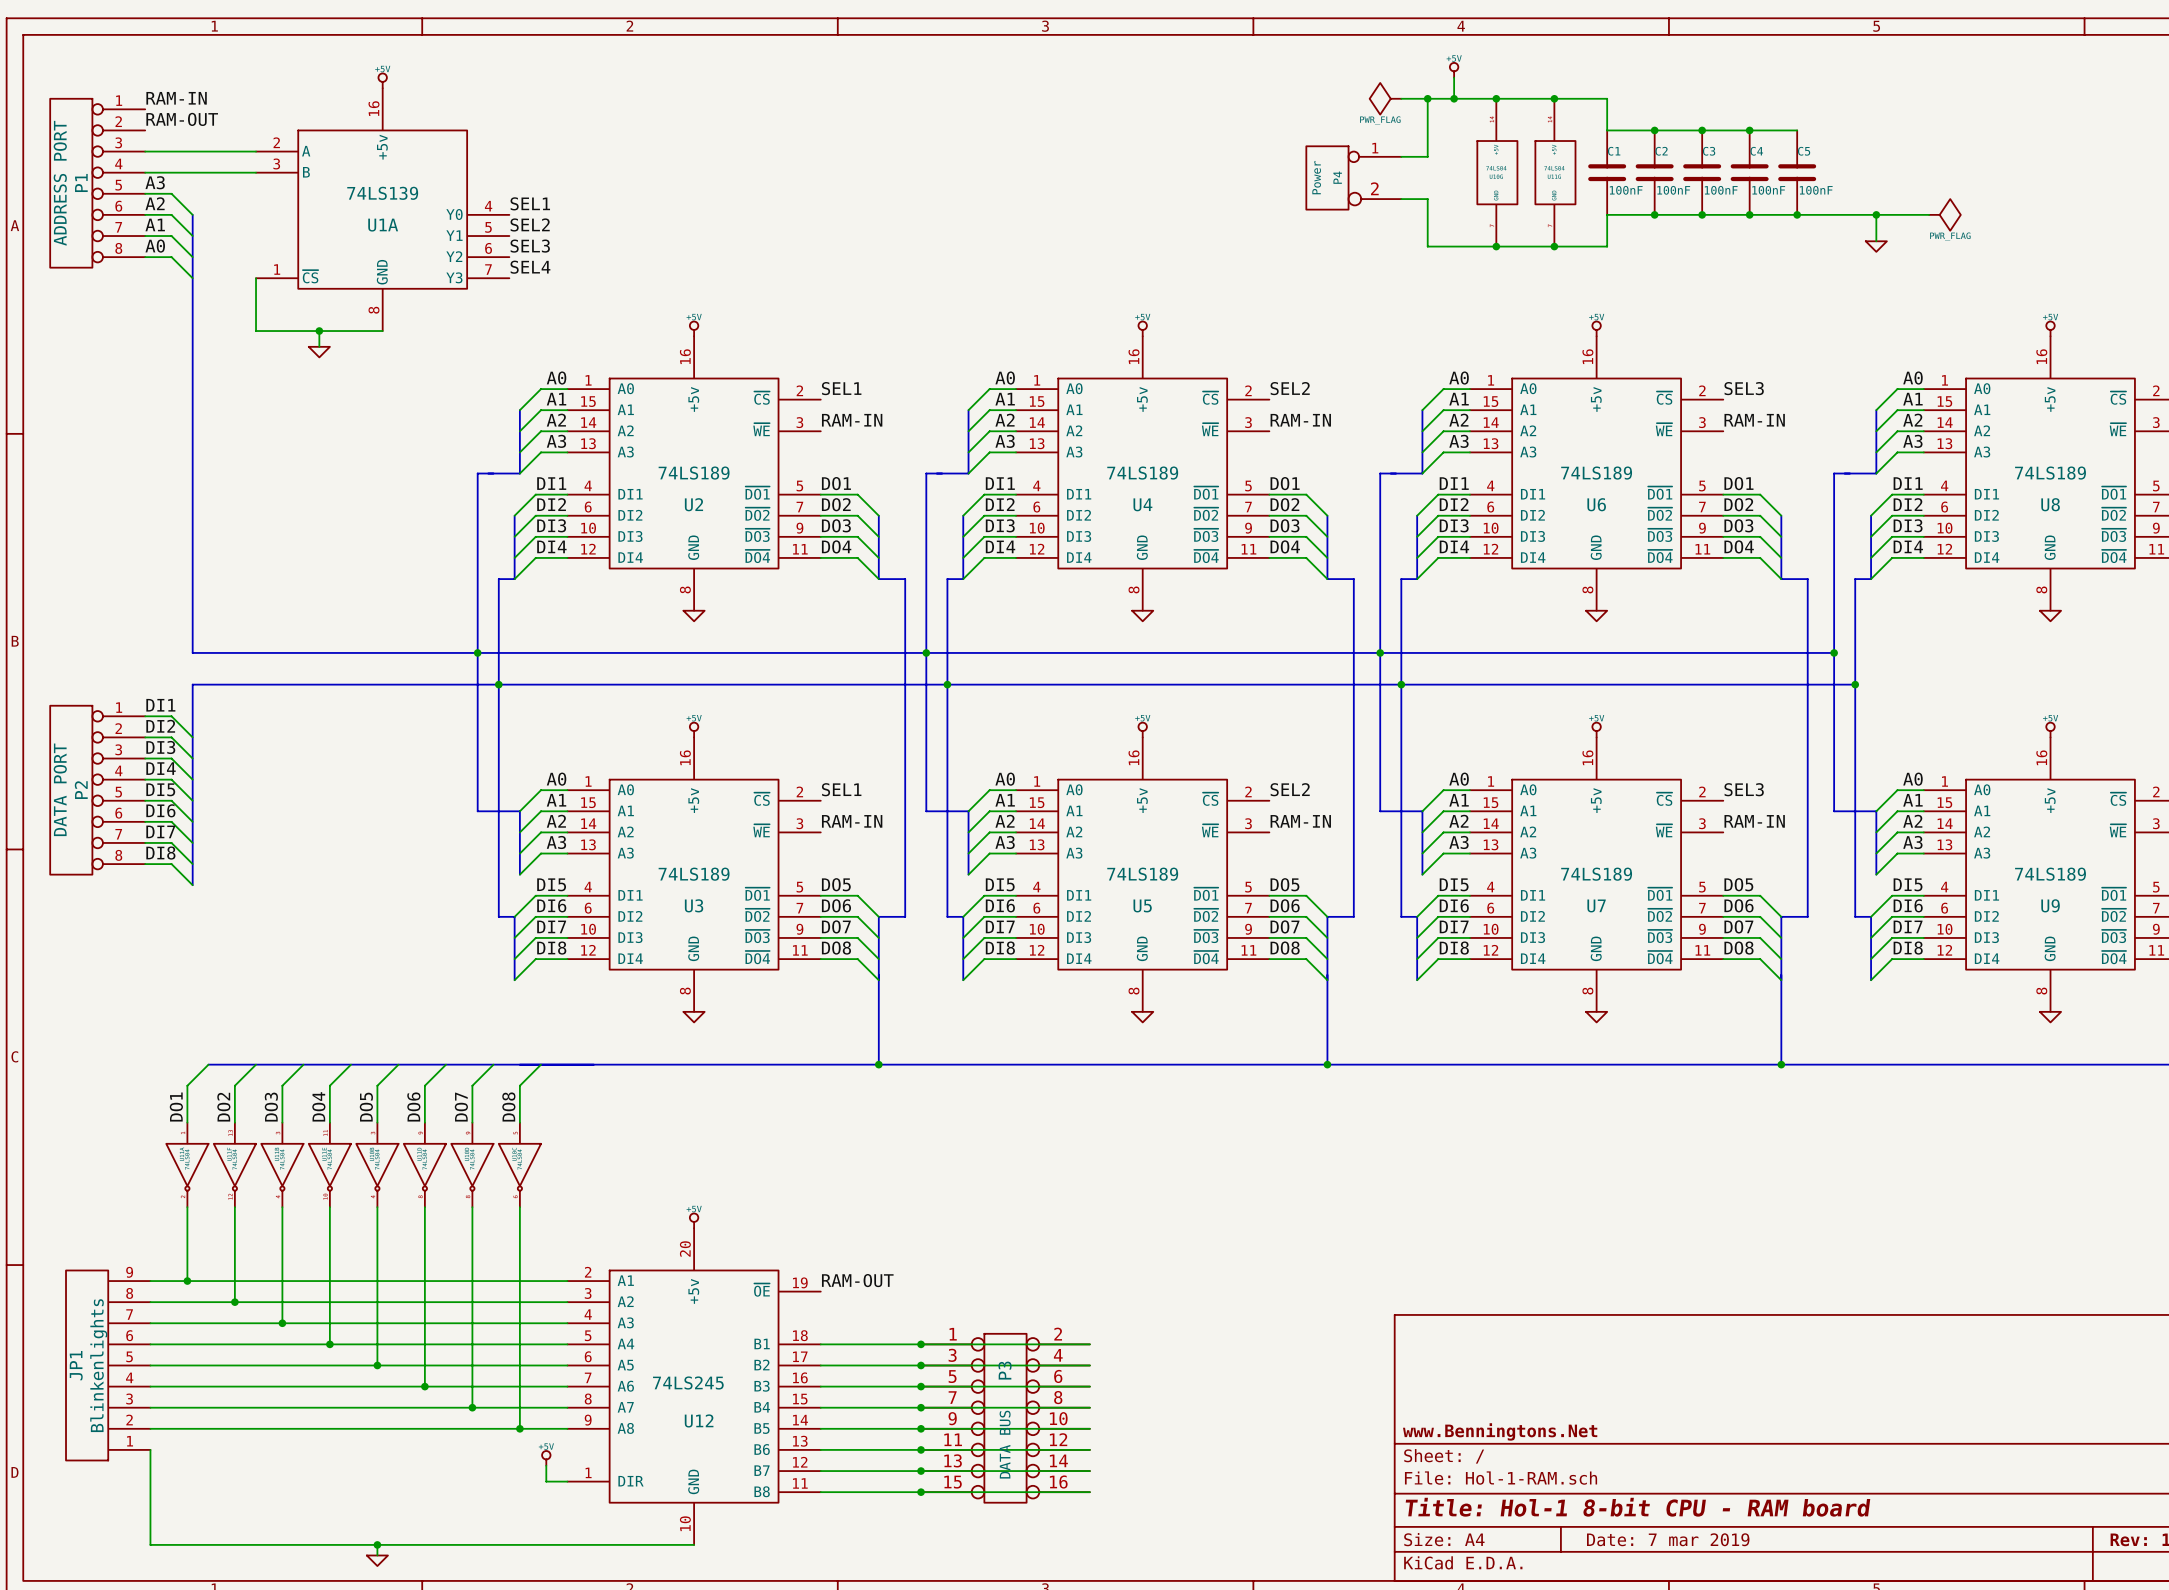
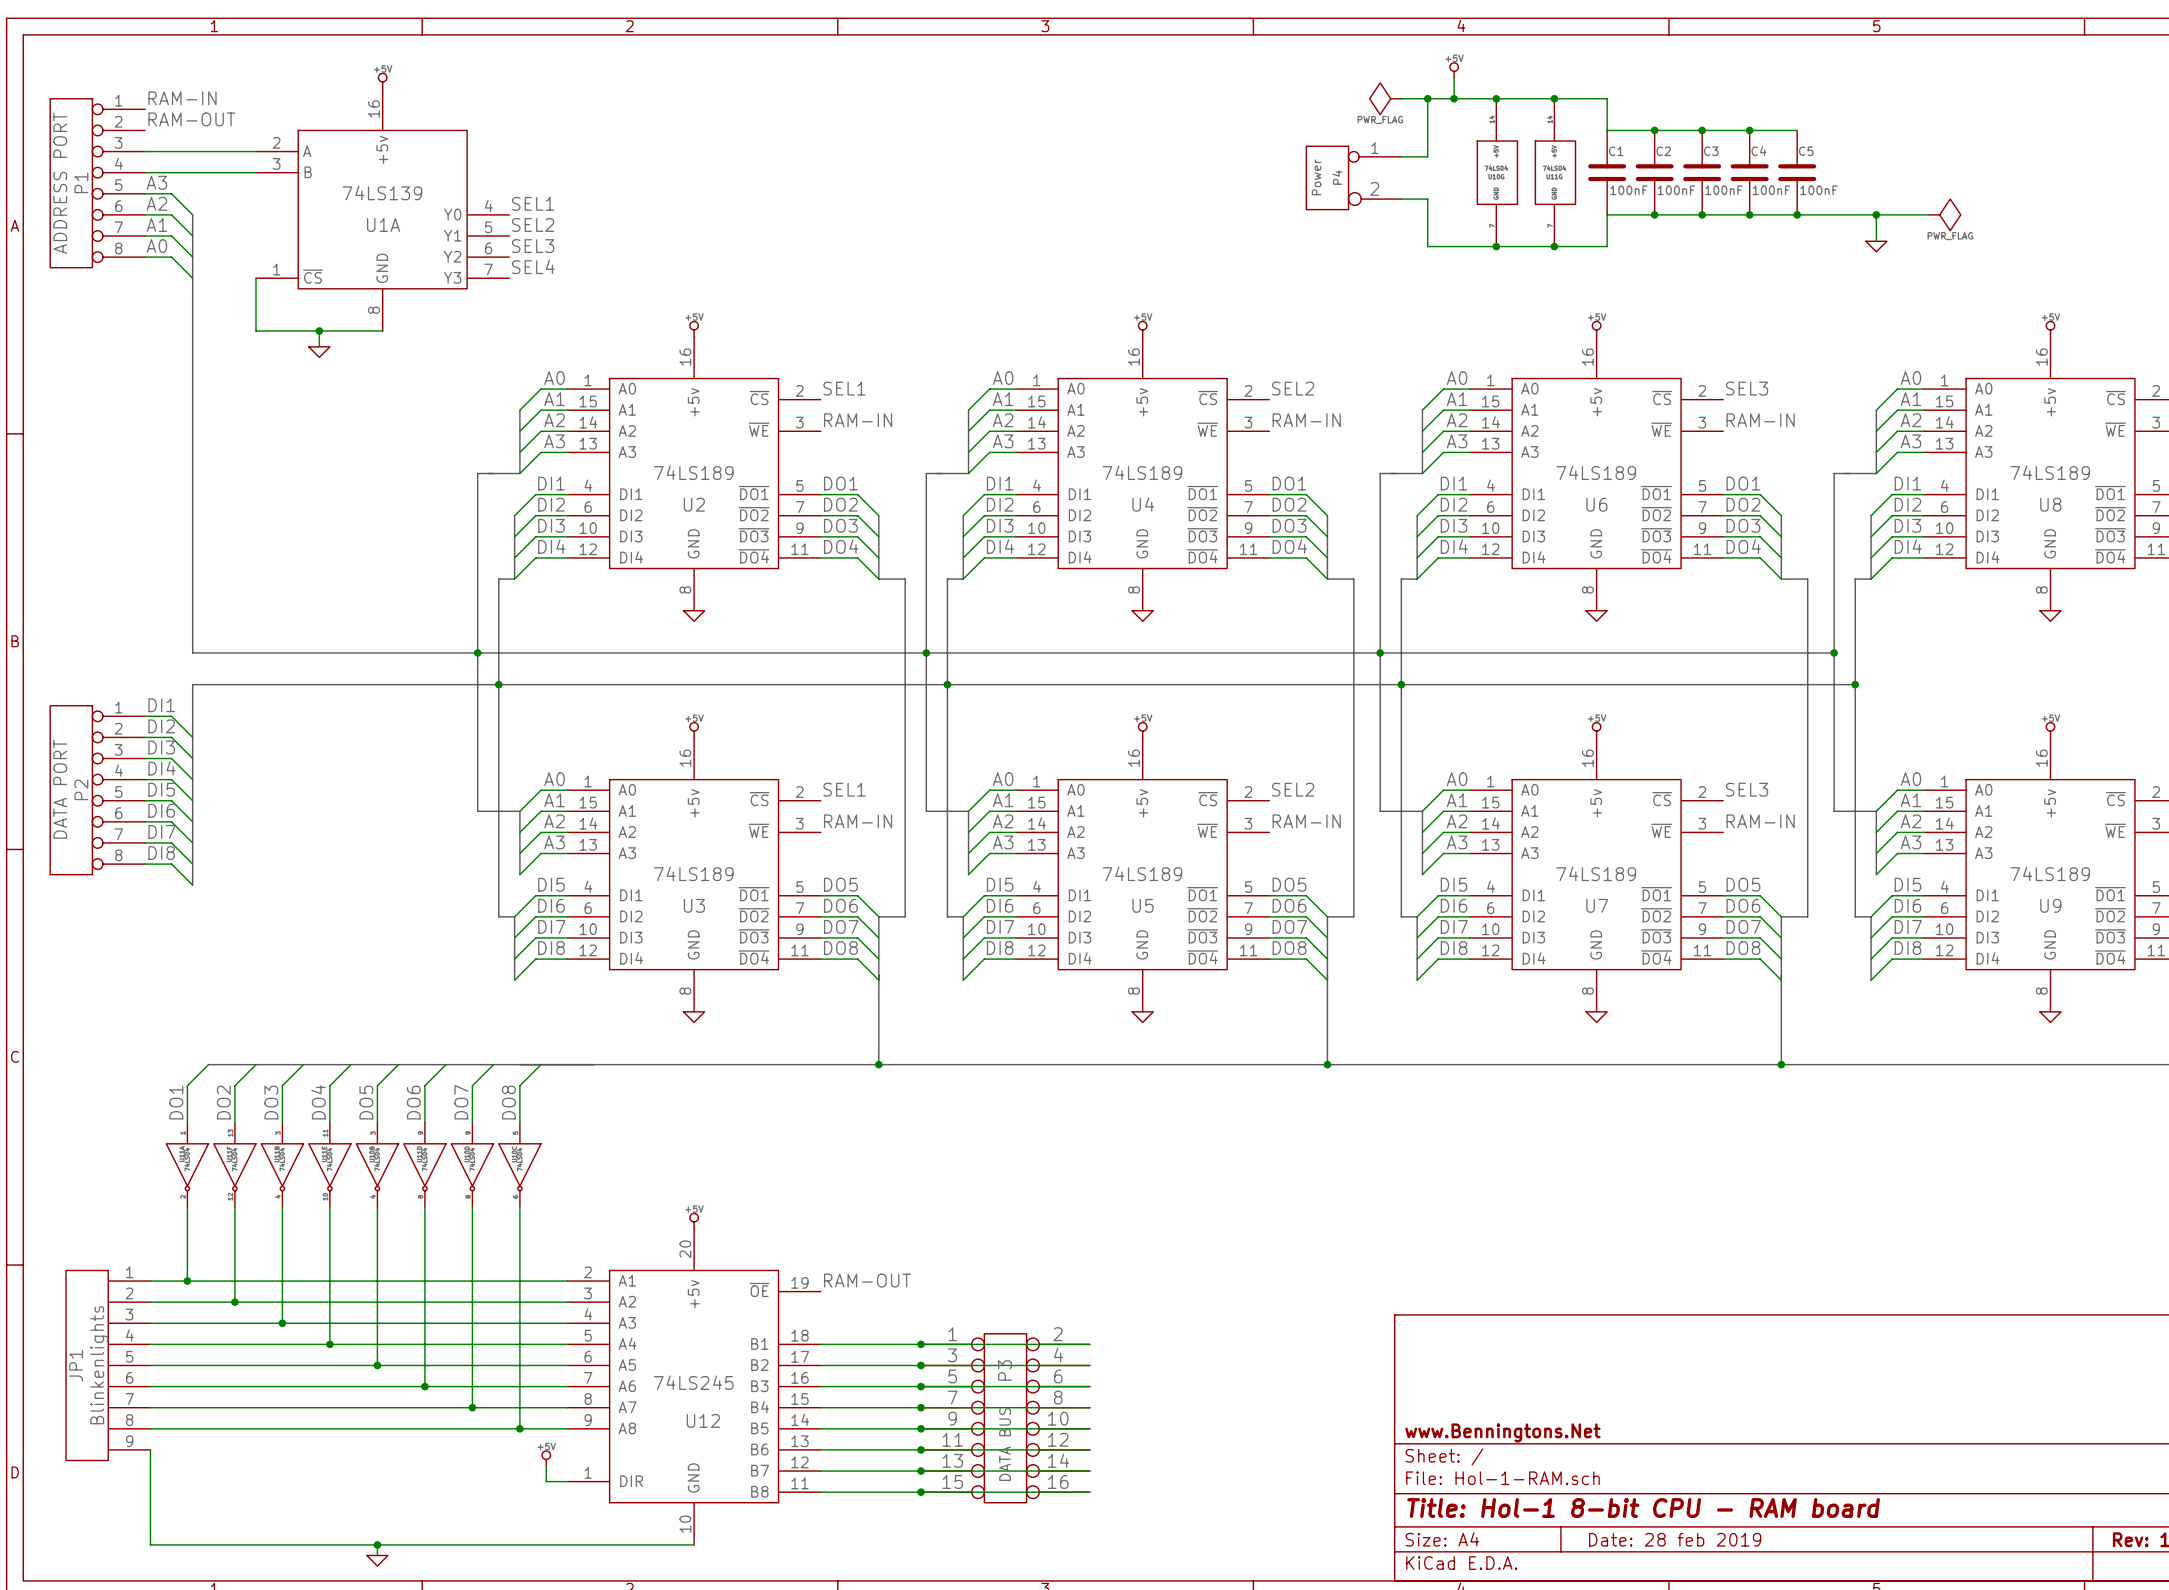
JP1 flip: as is (87, 1365) -> up-down (87, 1365)
title block: Date: 7 mar 2019 (1668, 1539) -> Date: 28 feb 2019 (1675, 1539)

